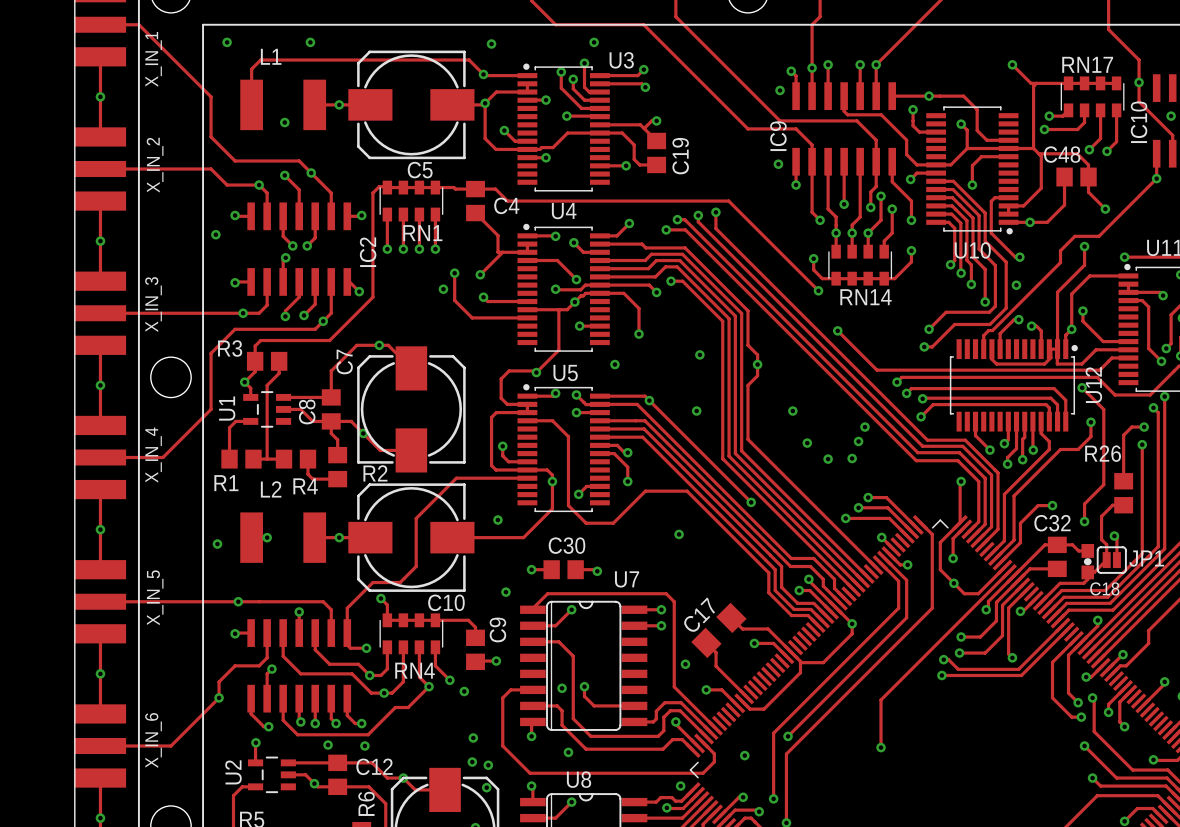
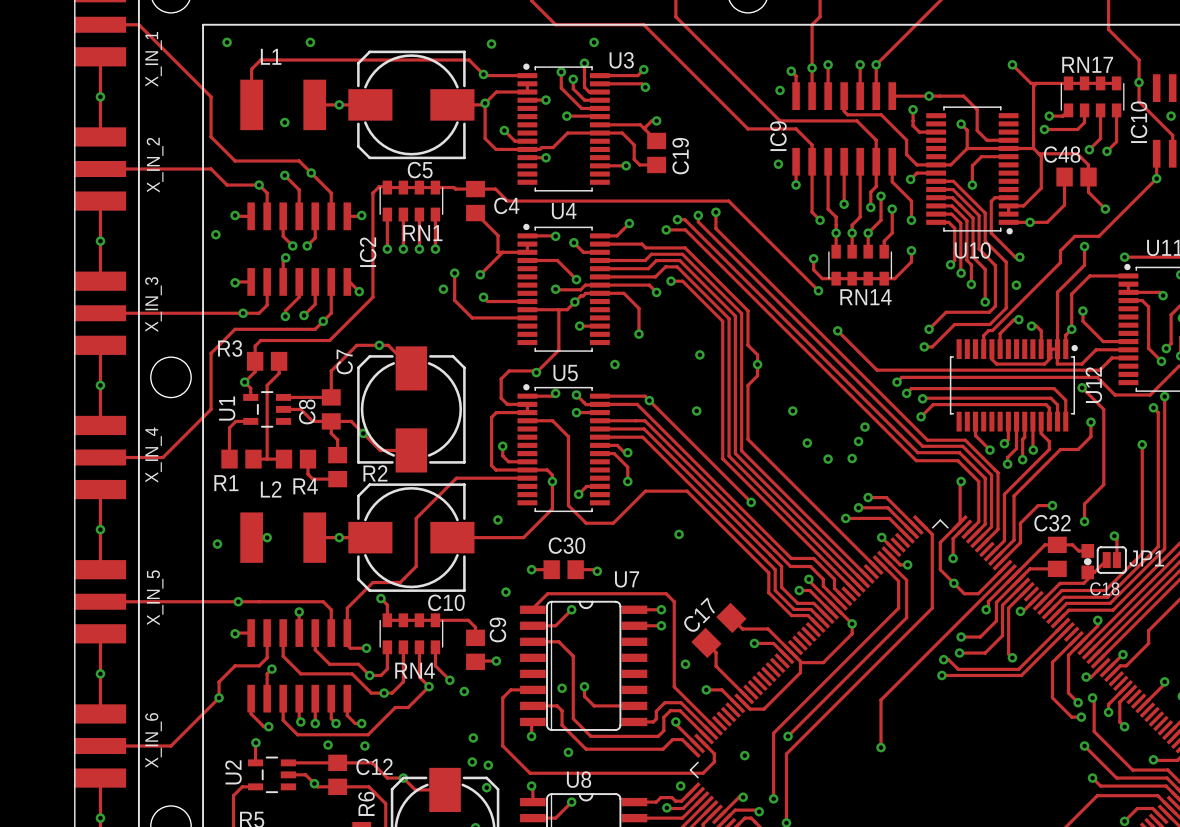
track: (1144, 427) (1131, 427) (1123, 435) (1123, 481) -> none
via: (1144, 427) -> none
R26: (1123, 493) -> none
track: (1123, 505) (1112, 505) (1101, 516) (1101, 539) (1106, 544) (1106, 560) -> none

